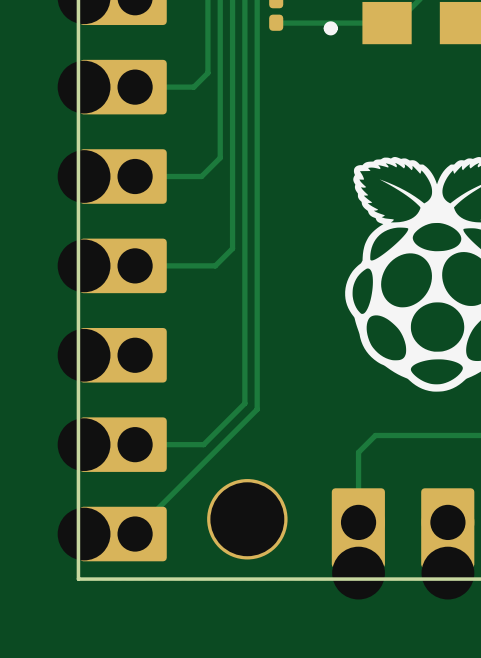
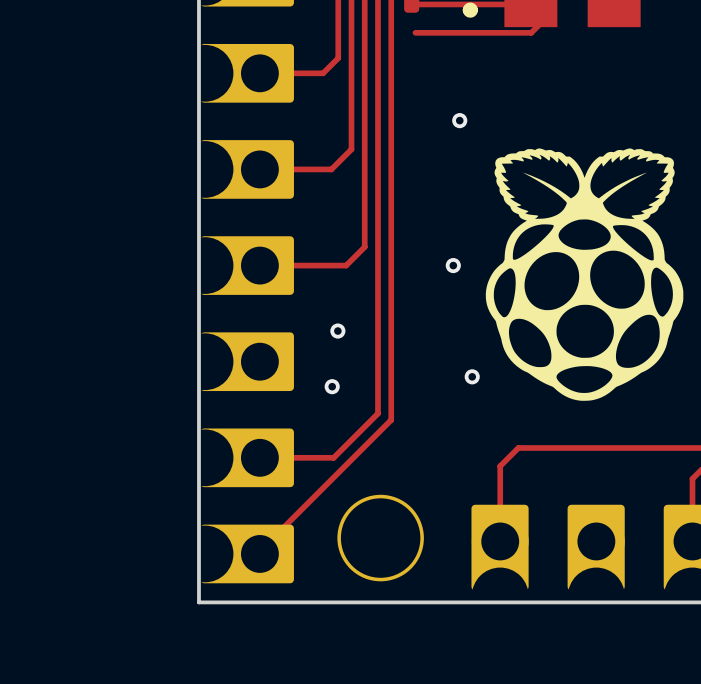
track: none -> (540, 23) (531, 32) (415, 32)
via: none -> (459, 120)
via: none -> (453, 265)
via: none -> (337, 331)
via: none -> (472, 376)
via: none -> (332, 386)

